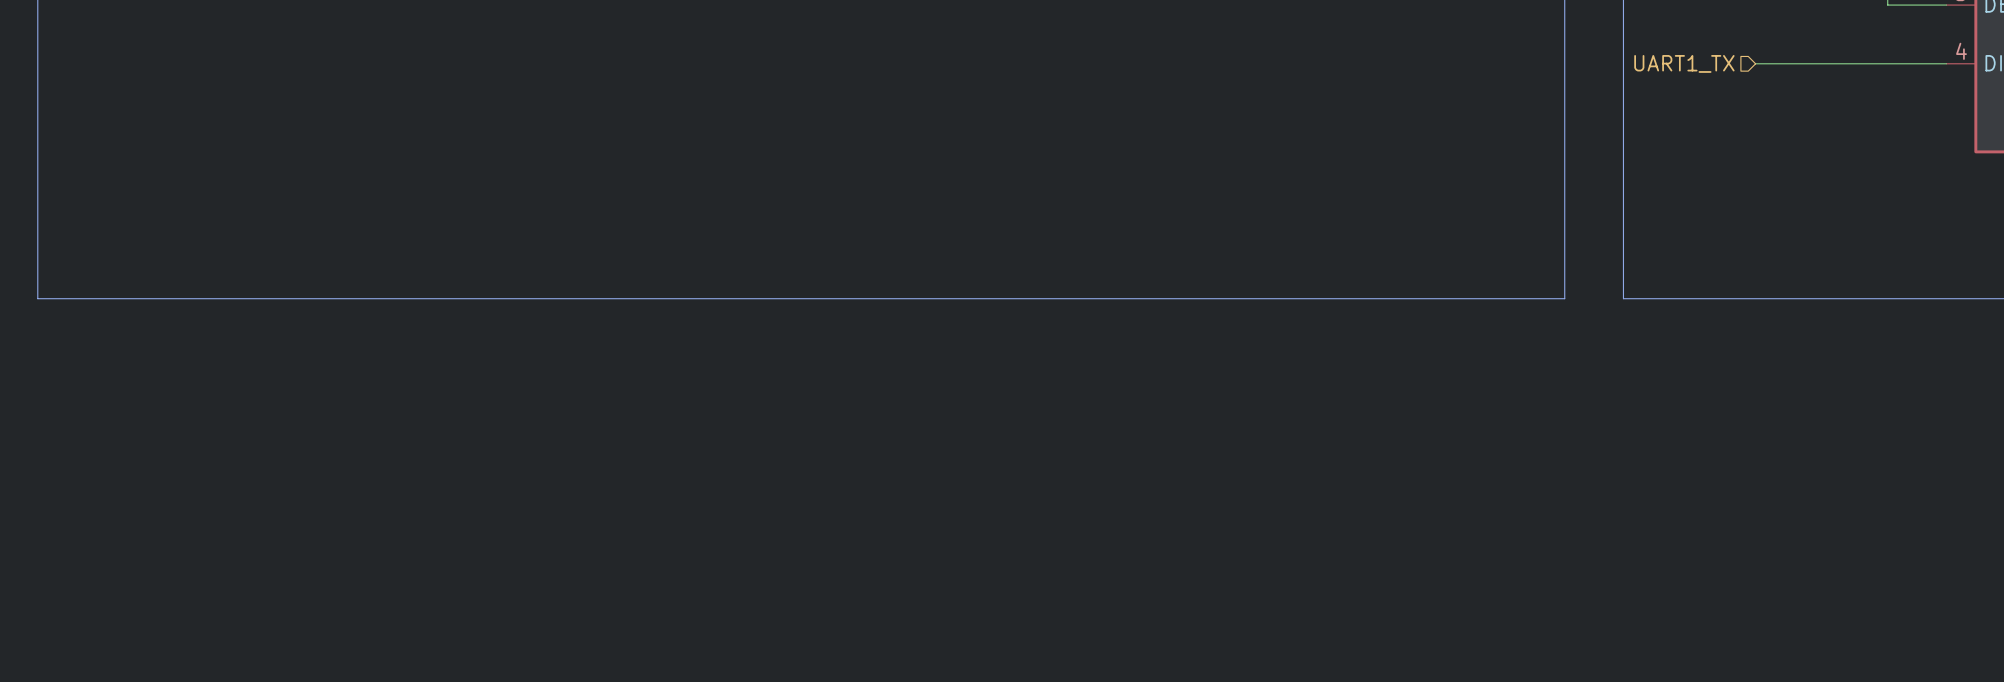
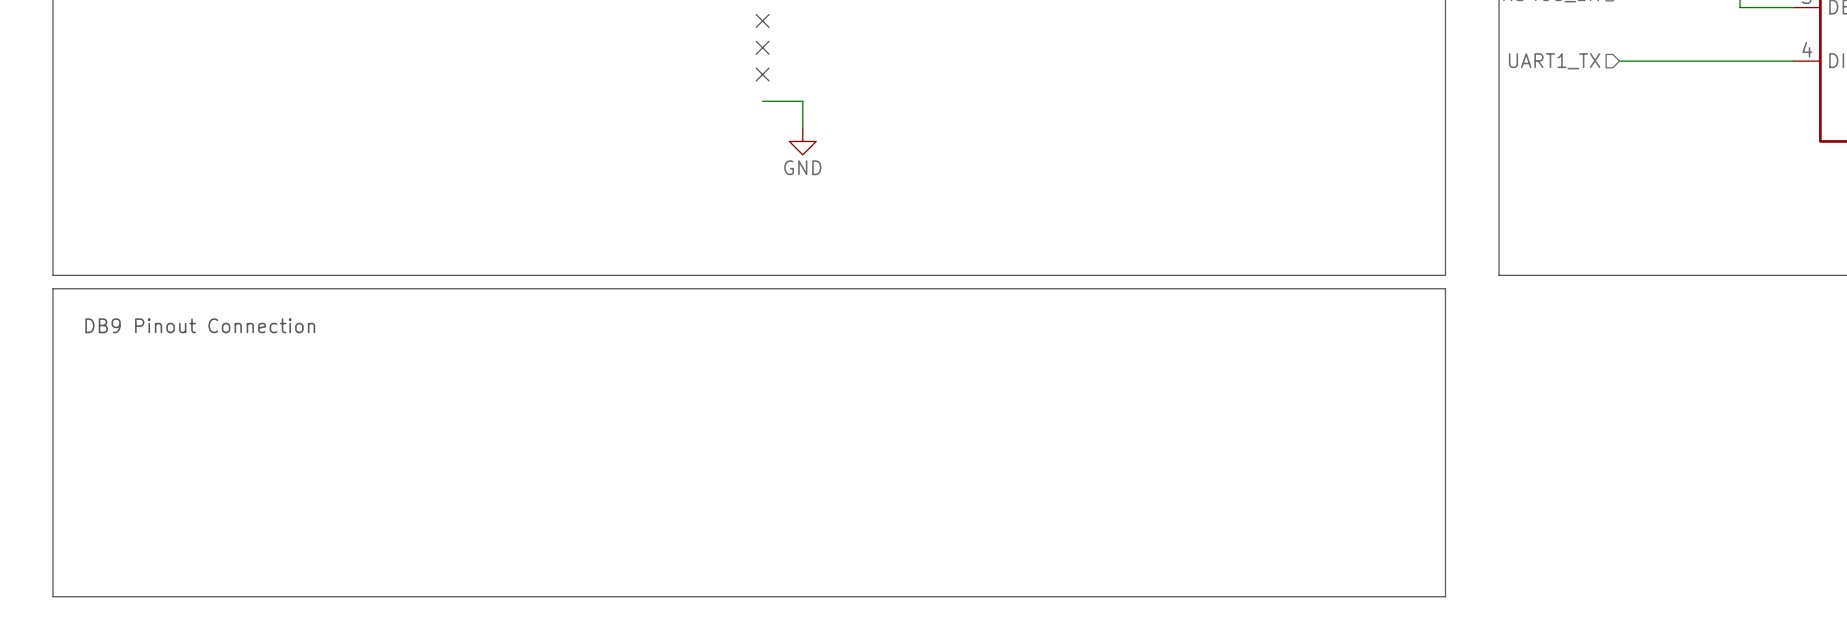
no-connect mark: none -> (762, 20)
no-connect mark: none -> (762, 47)
no-connect mark: none -> (762, 74)
wire: none -> (762, 101) (802, 101) (802, 128)
power symbol: none -> GND (802, 141)
line: none -> (52, 288) (1445, 288) (1445, 596) (52, 596) (52, 288)
text: none -> DB9 Pinout Connection (200, 325)

